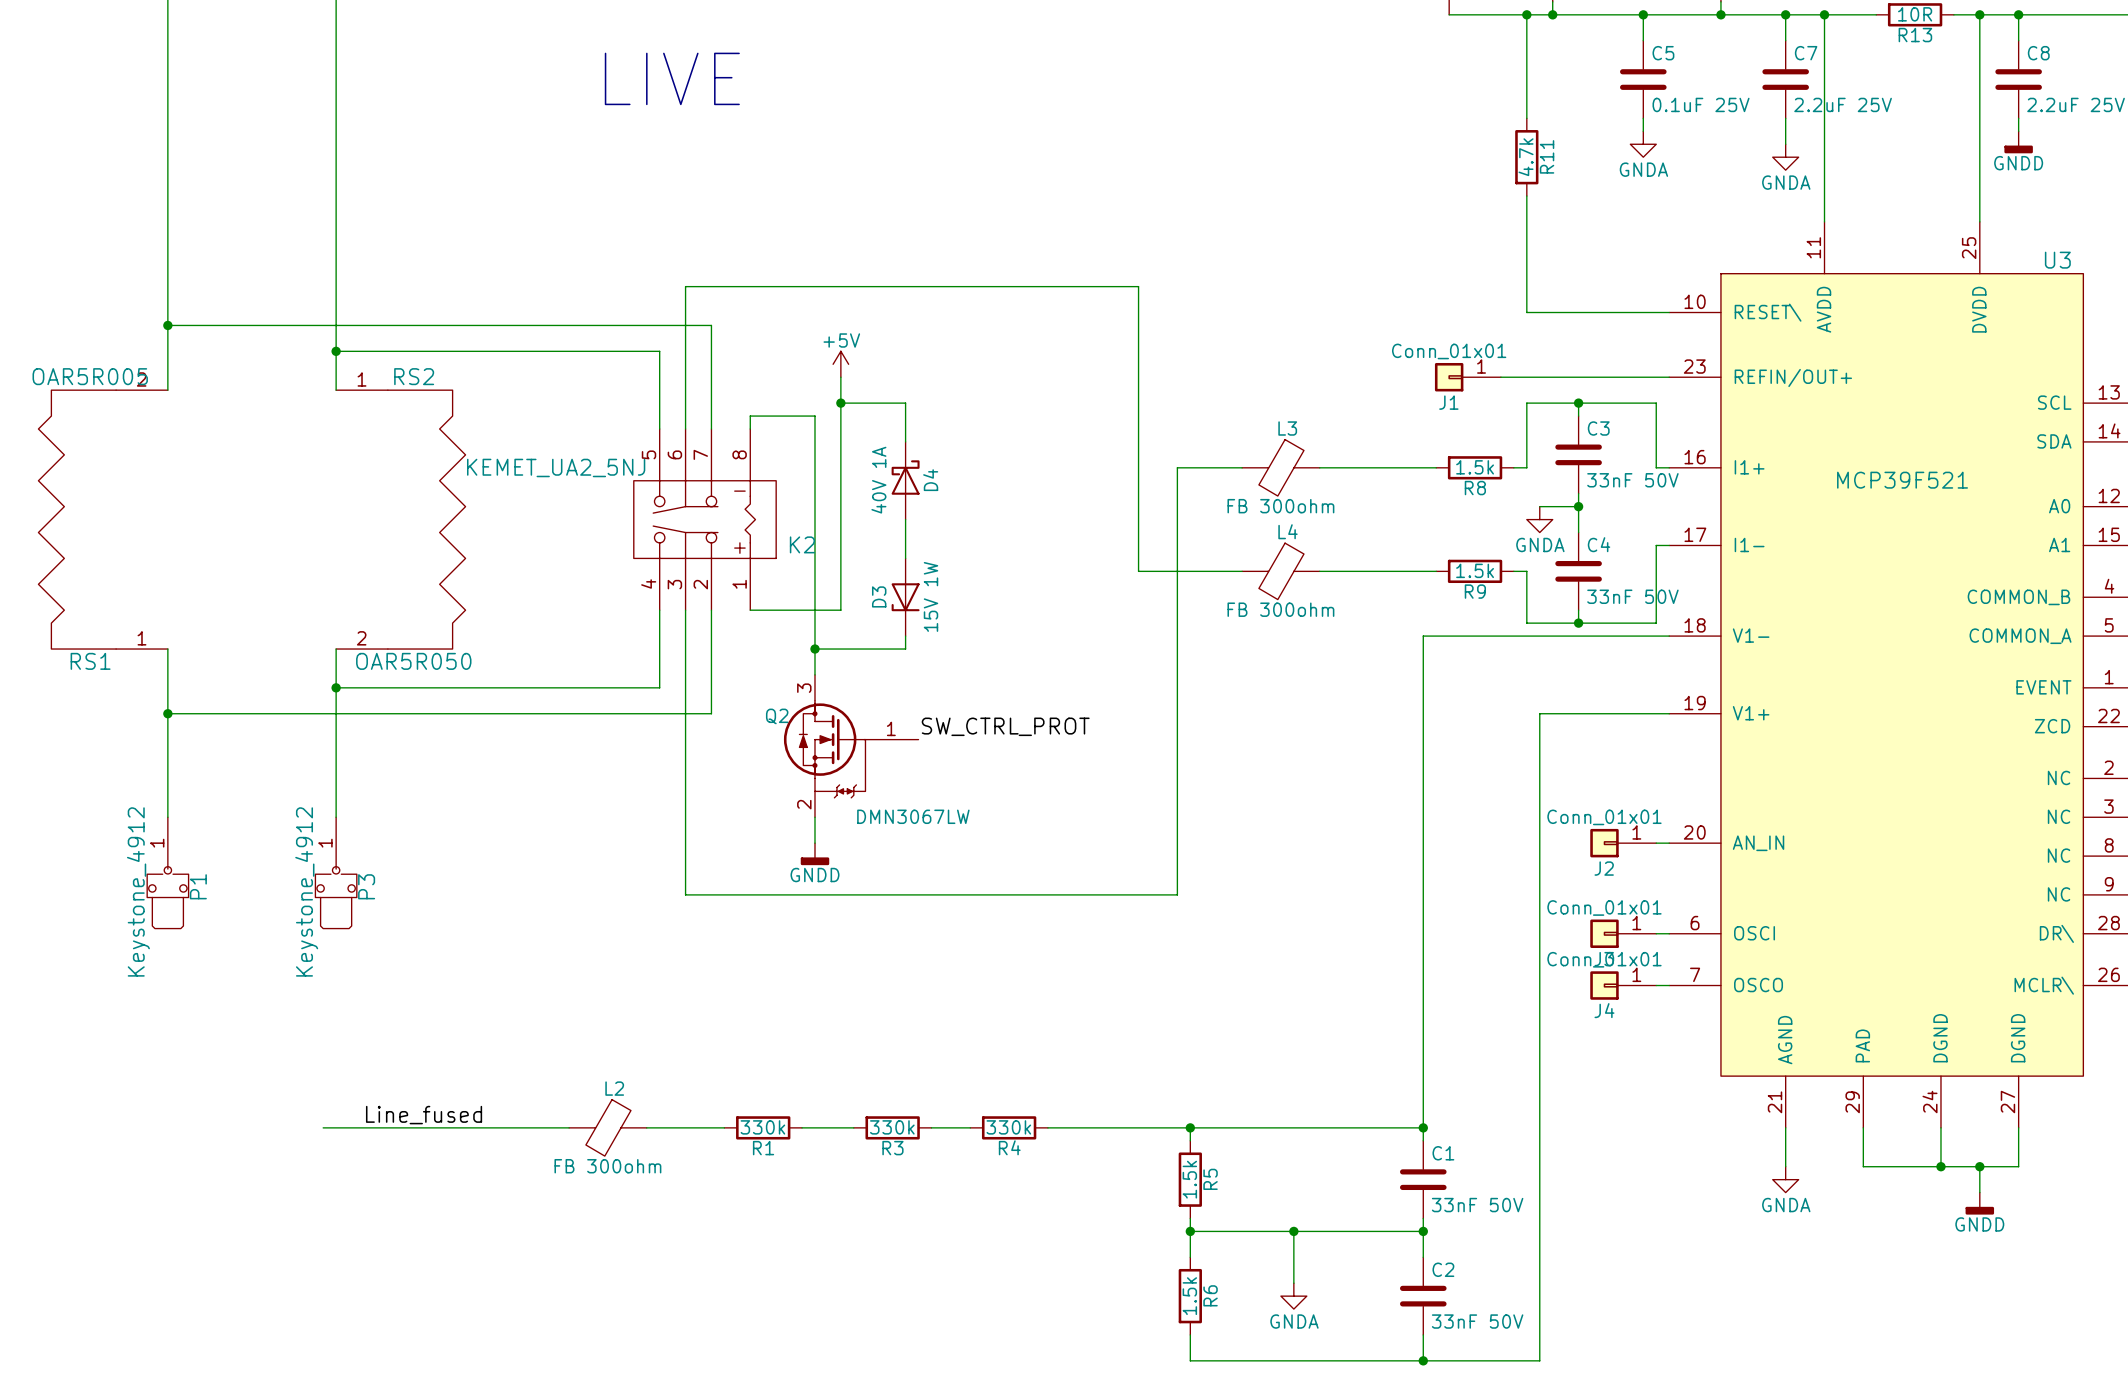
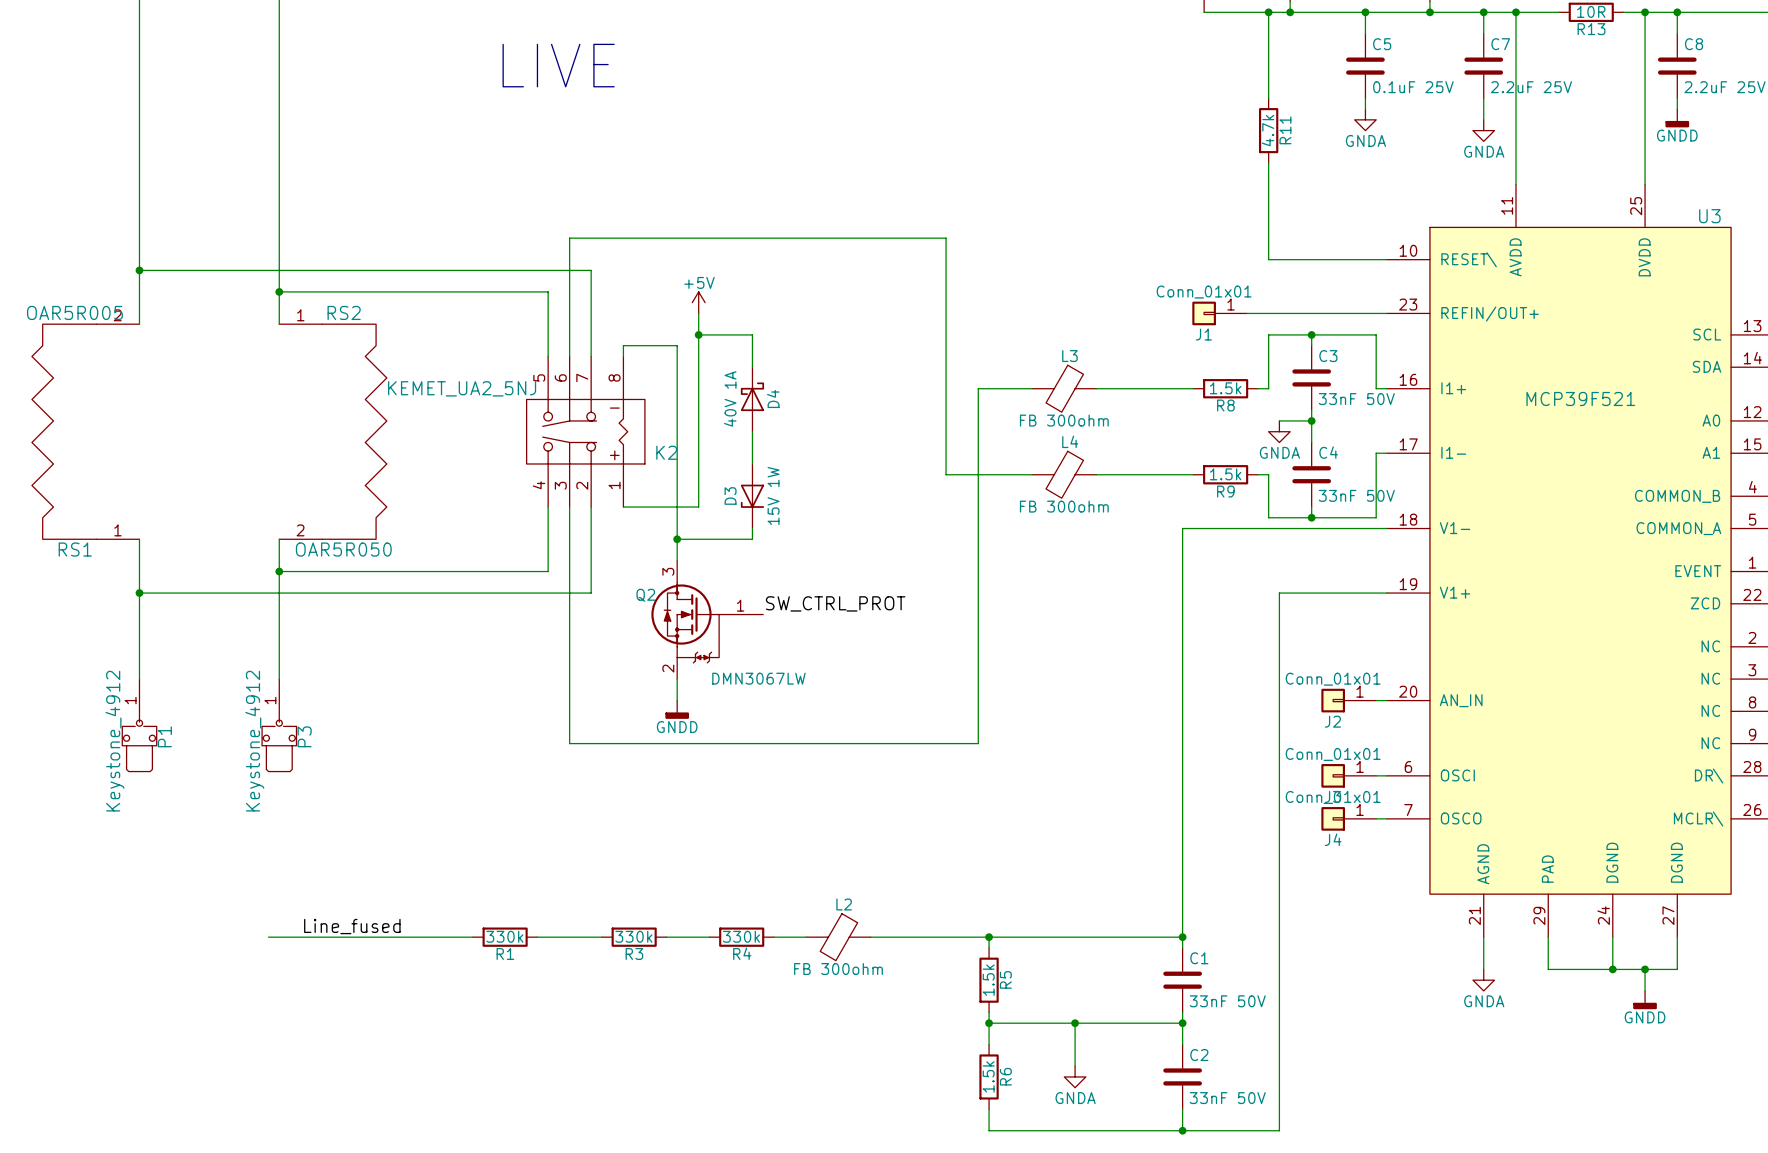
L2 position: (607, 1127) -> (838, 937)
R1: none -> 330k (505, 937)
R4: 330k (1009, 1127) -> none
R1 name: R1 (763, 1148) -> R3 (634, 953)
R3 name: R3 (892, 1148) -> R4 (742, 953)

